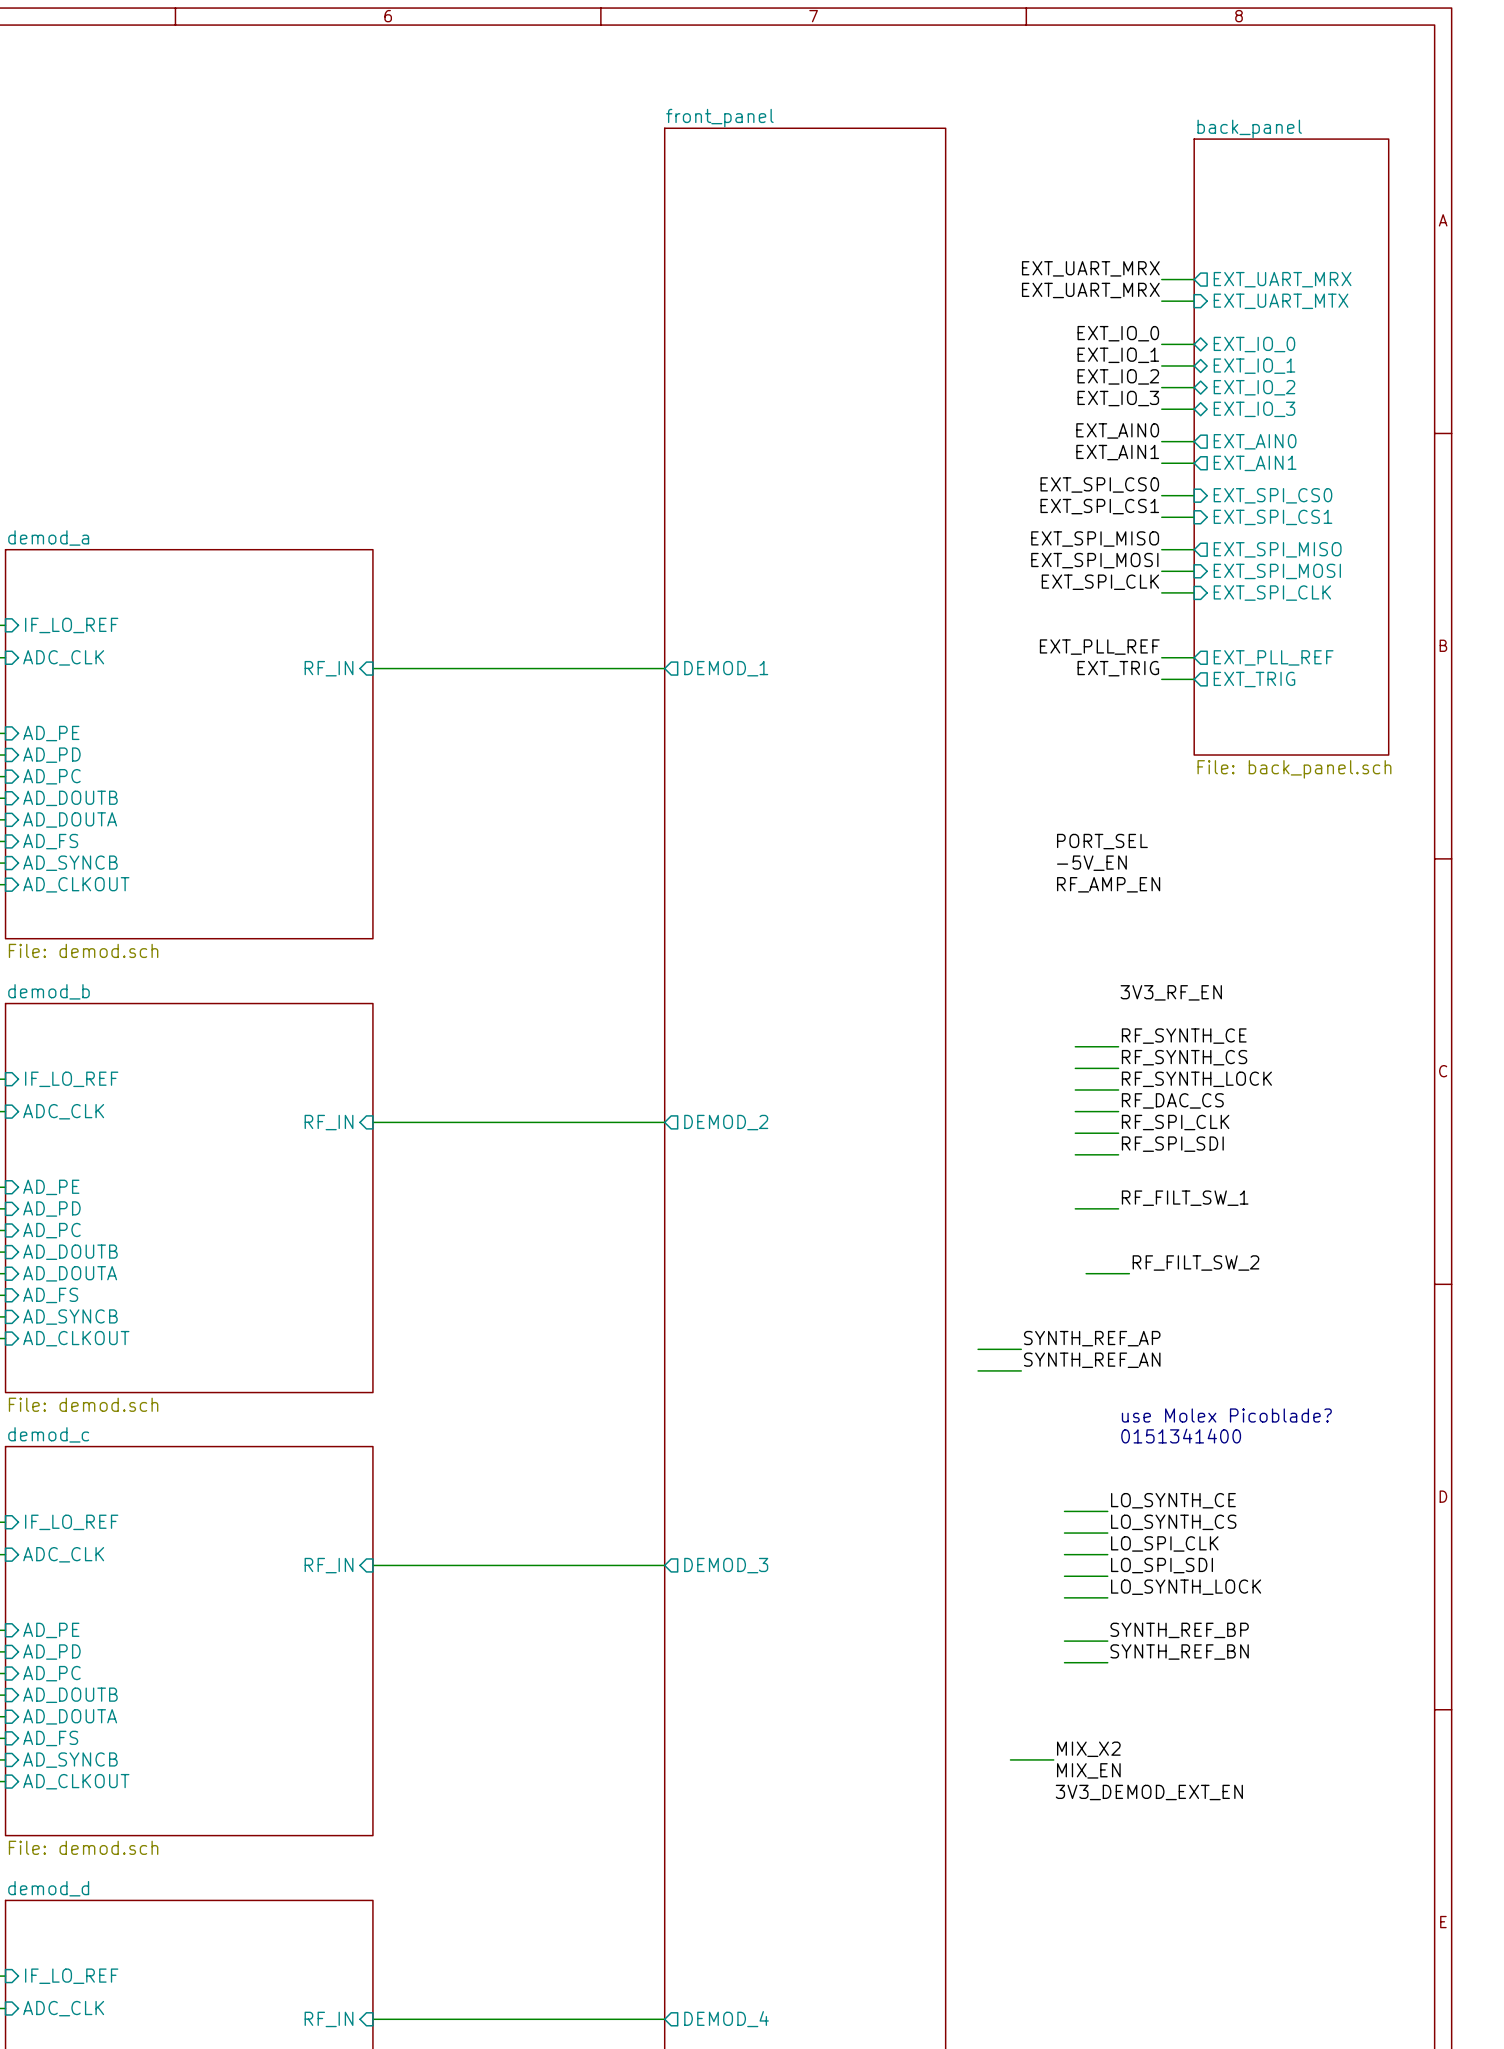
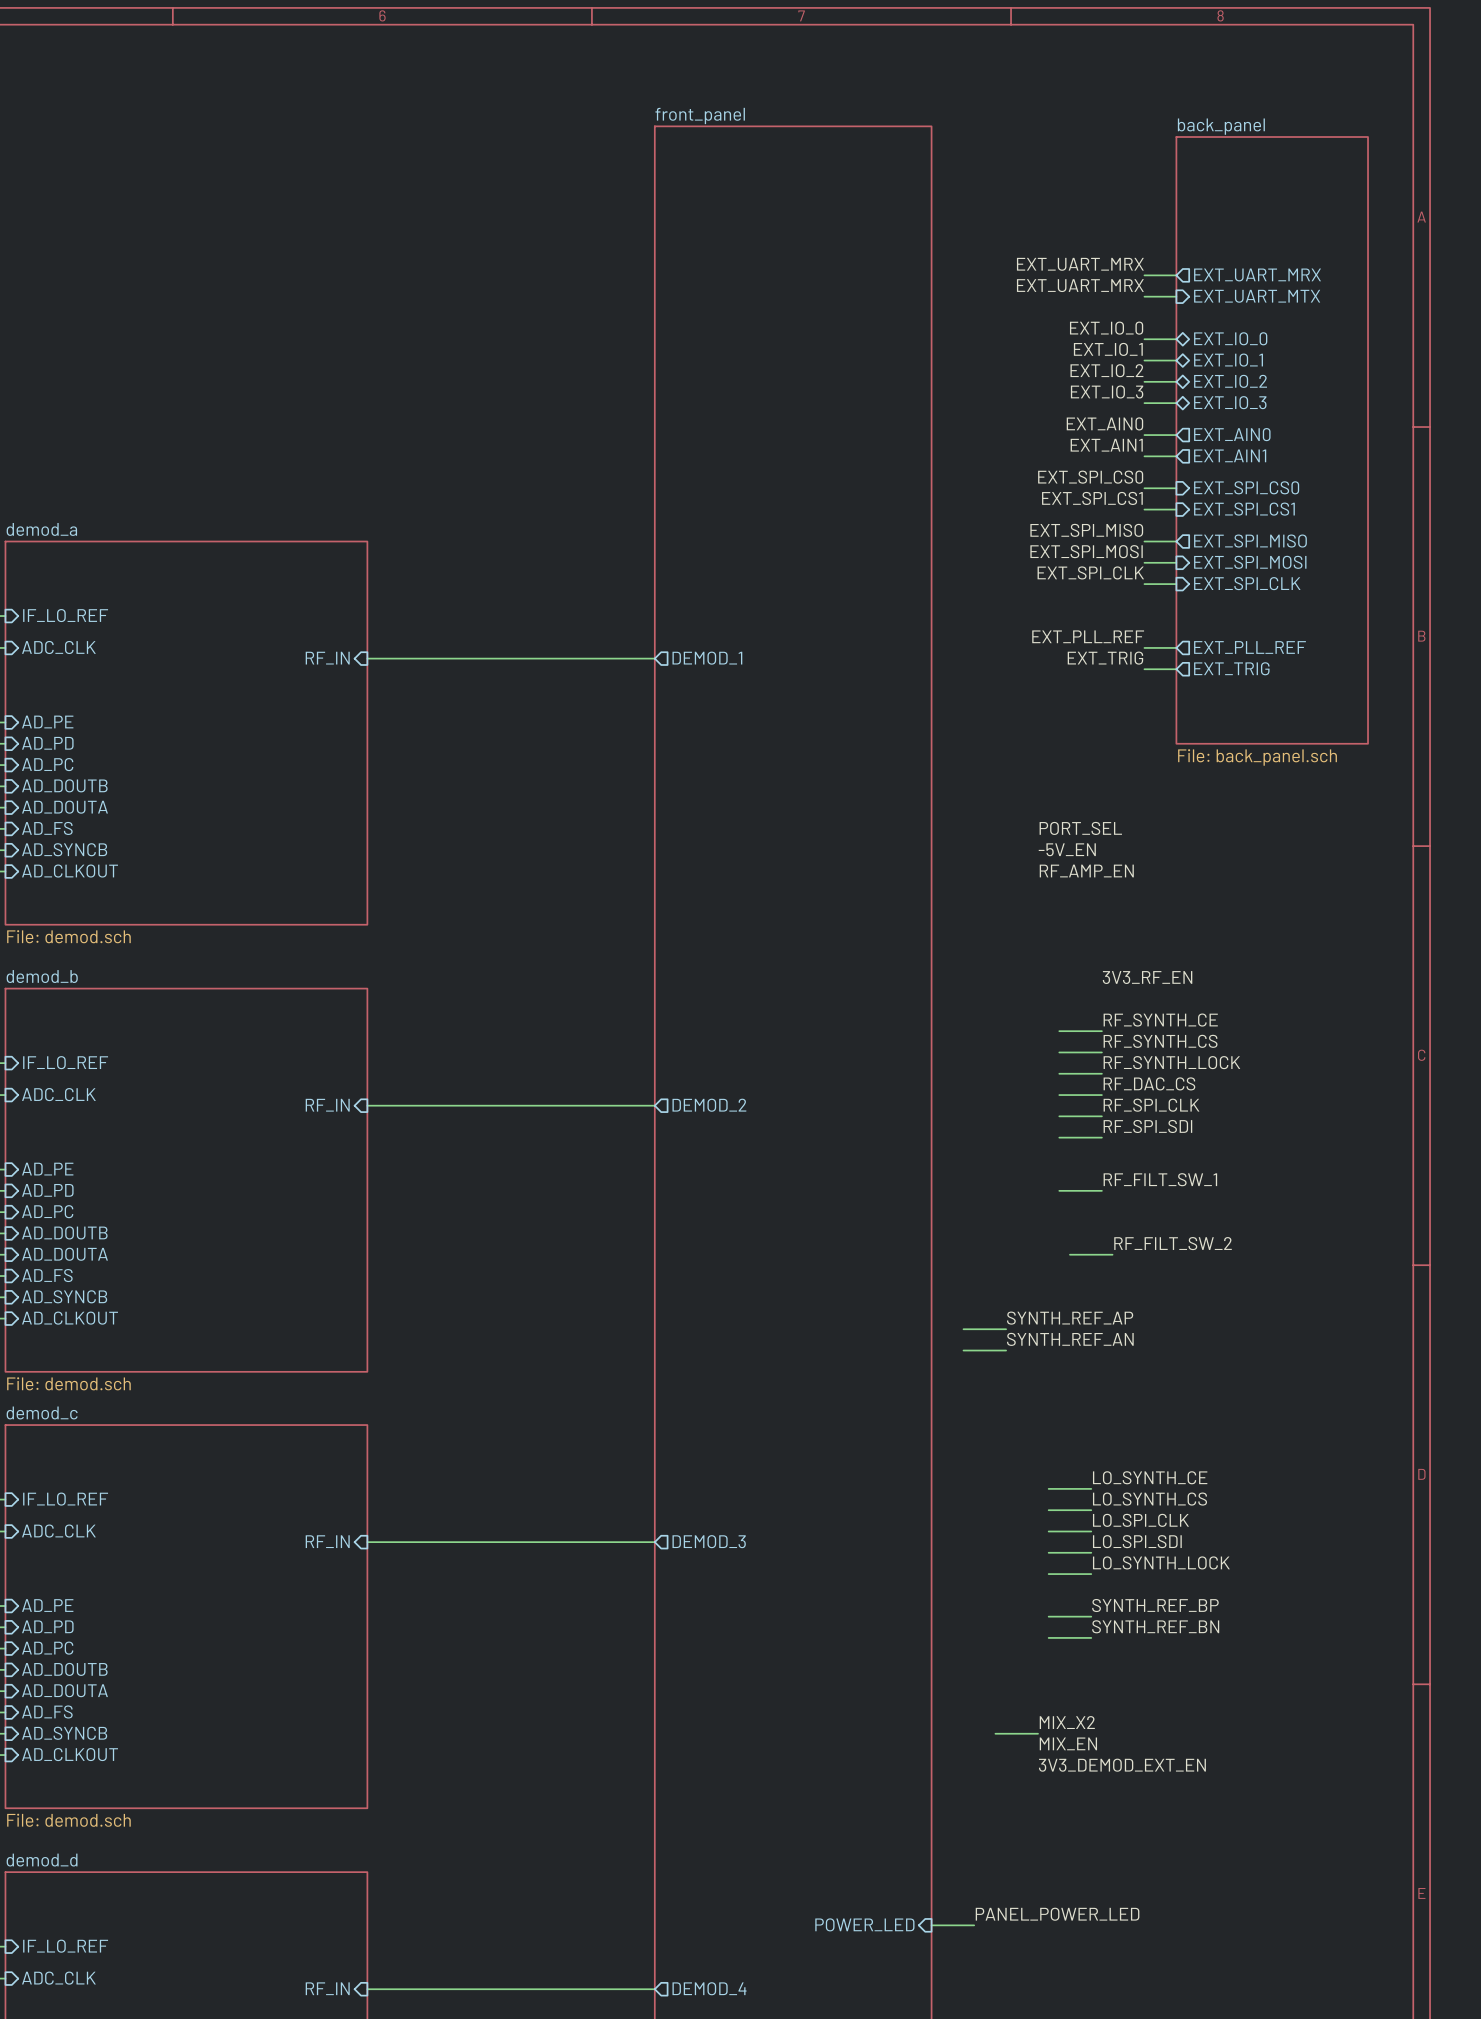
text: use Molex Picoblade? (1226, 1415) -> none
text: 0151341400 (1181, 1436) -> none
label: none -> PANEL_POWER_LED (1057, 1914)
sheet pin: none -> POWER_LED (864, 1924)
wire: none -> (931, 1925) (974, 1925)

